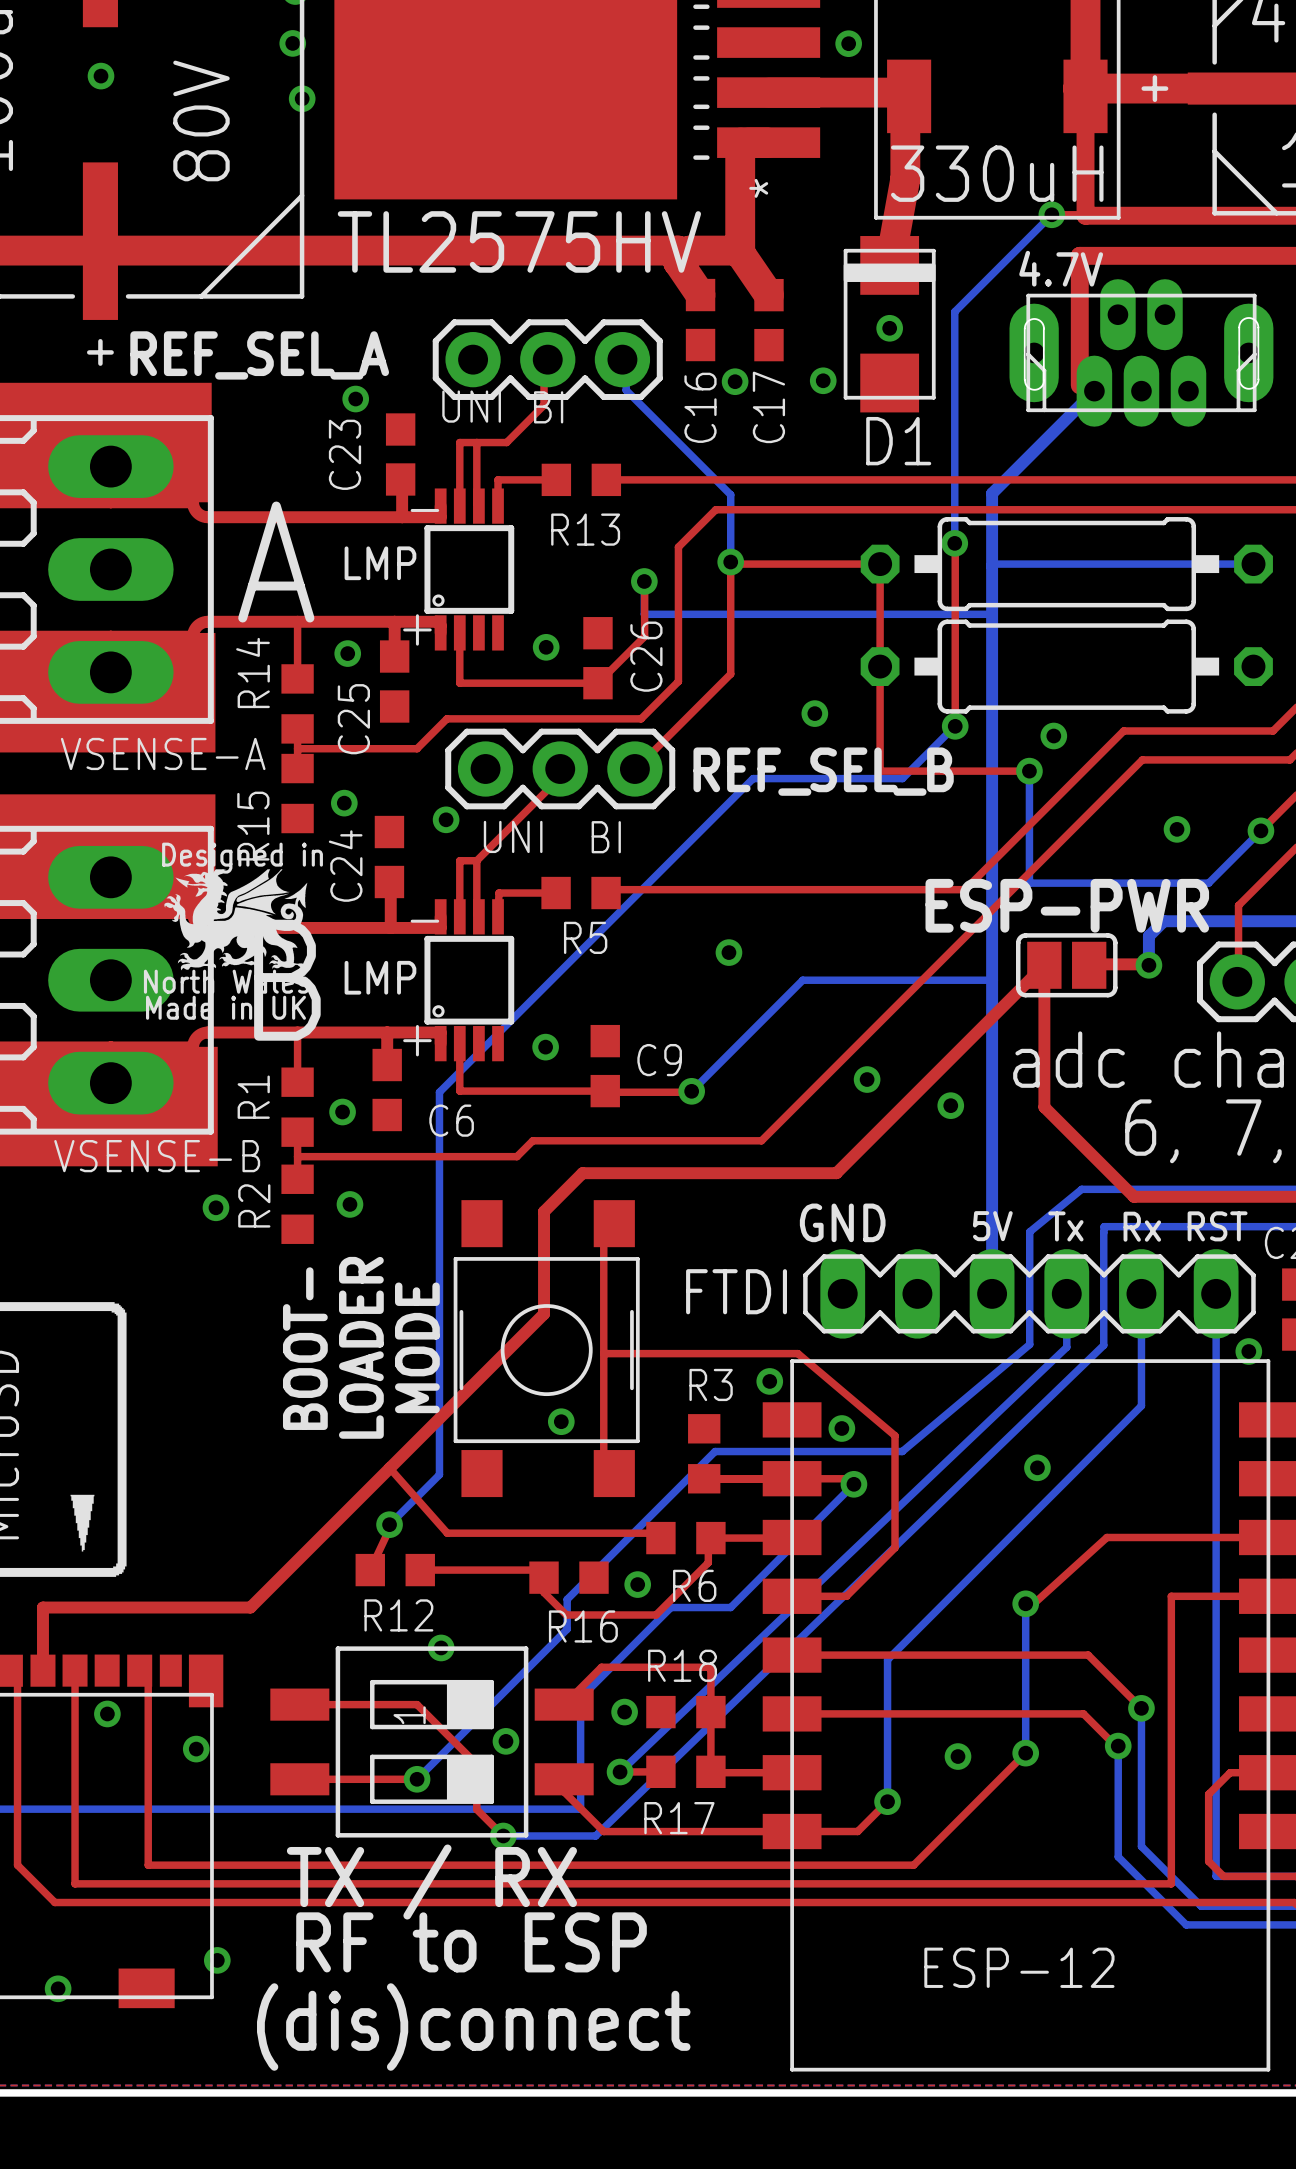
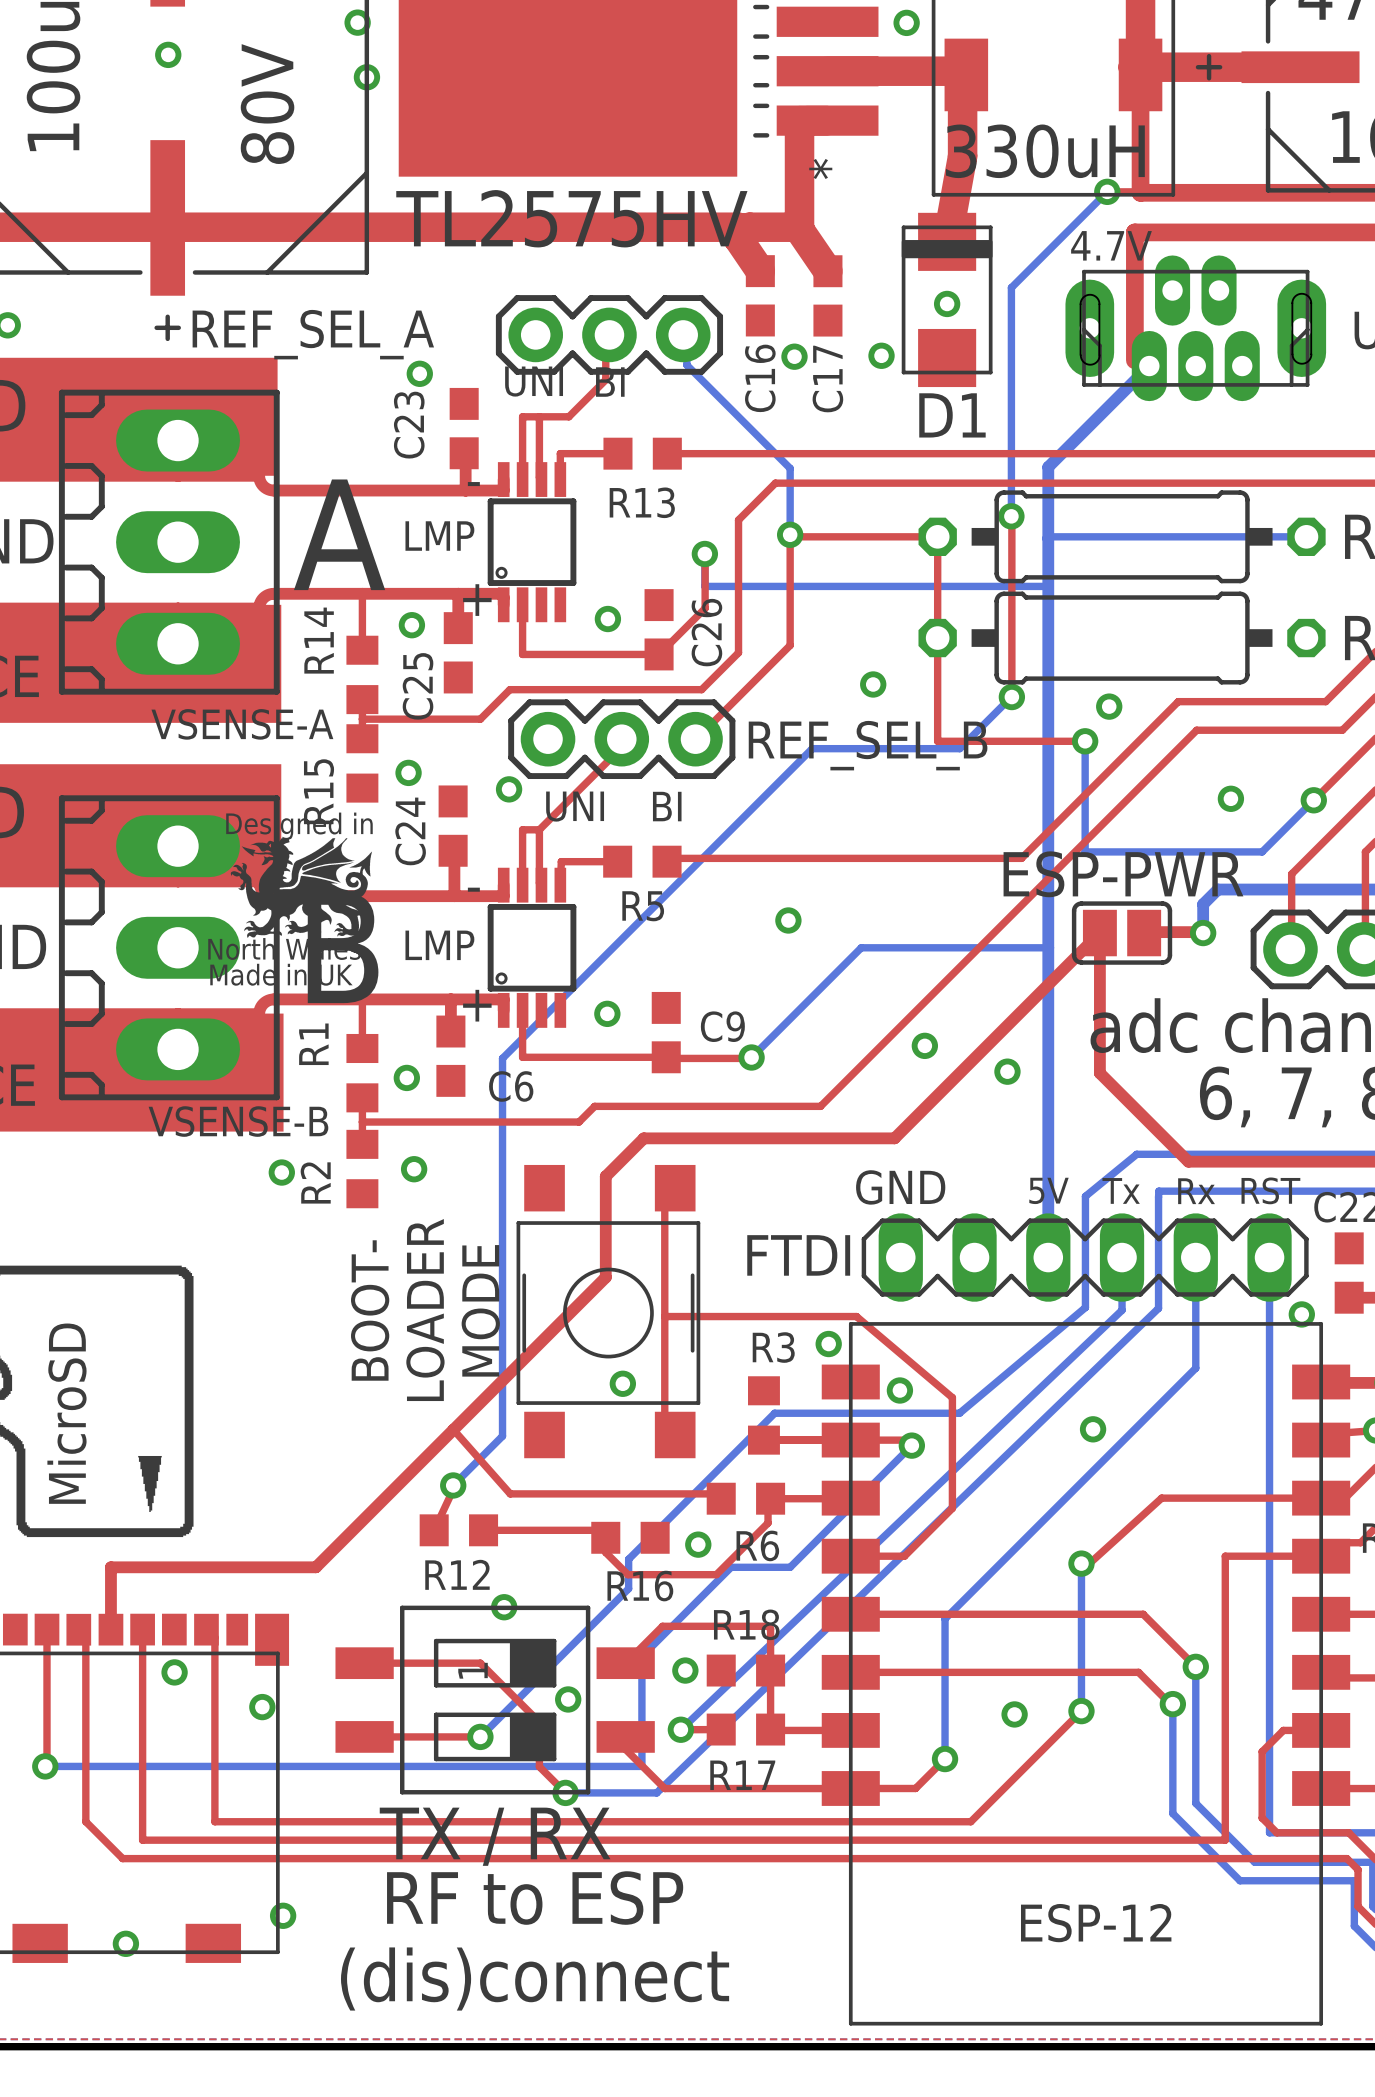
R1 name position: R1 (253, 1097) -> R1 (313, 1044)
R2 name position: R2 (254, 1205) -> R2 (315, 1182)

